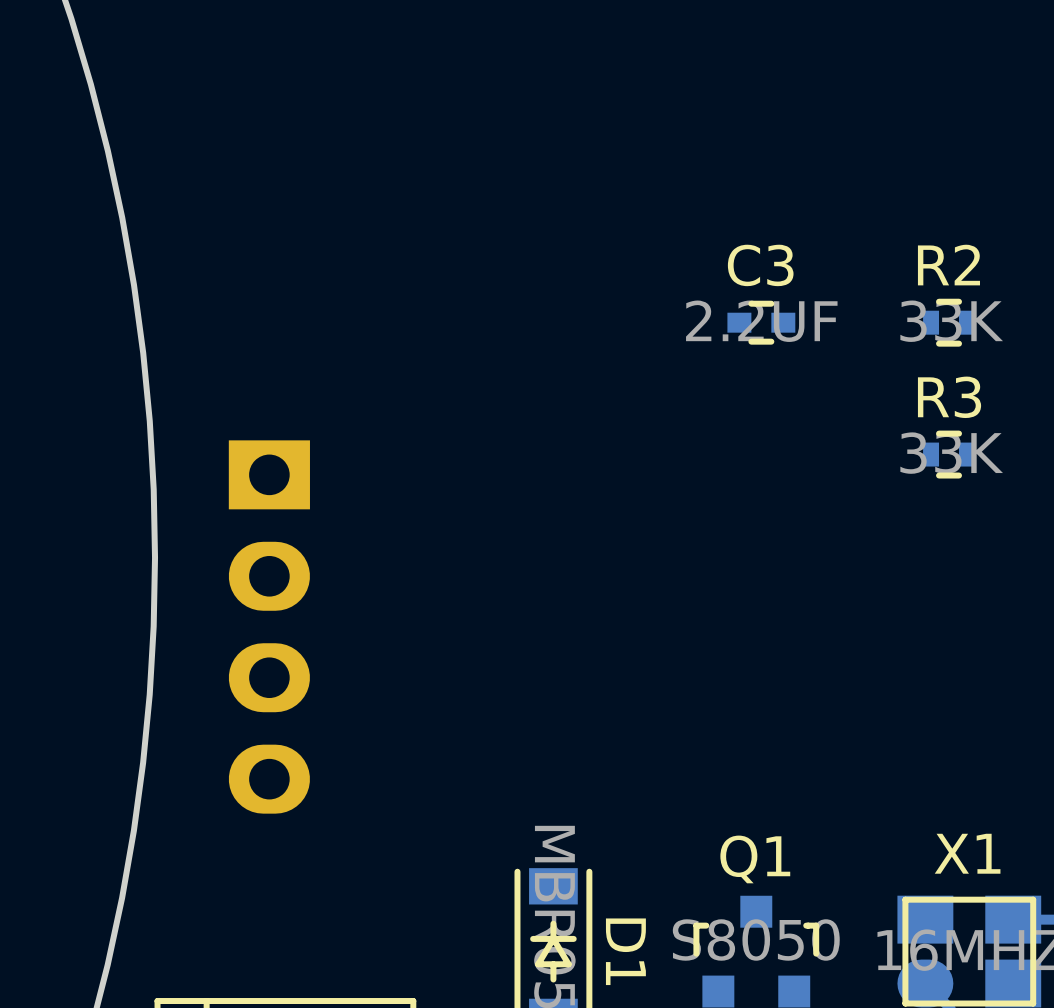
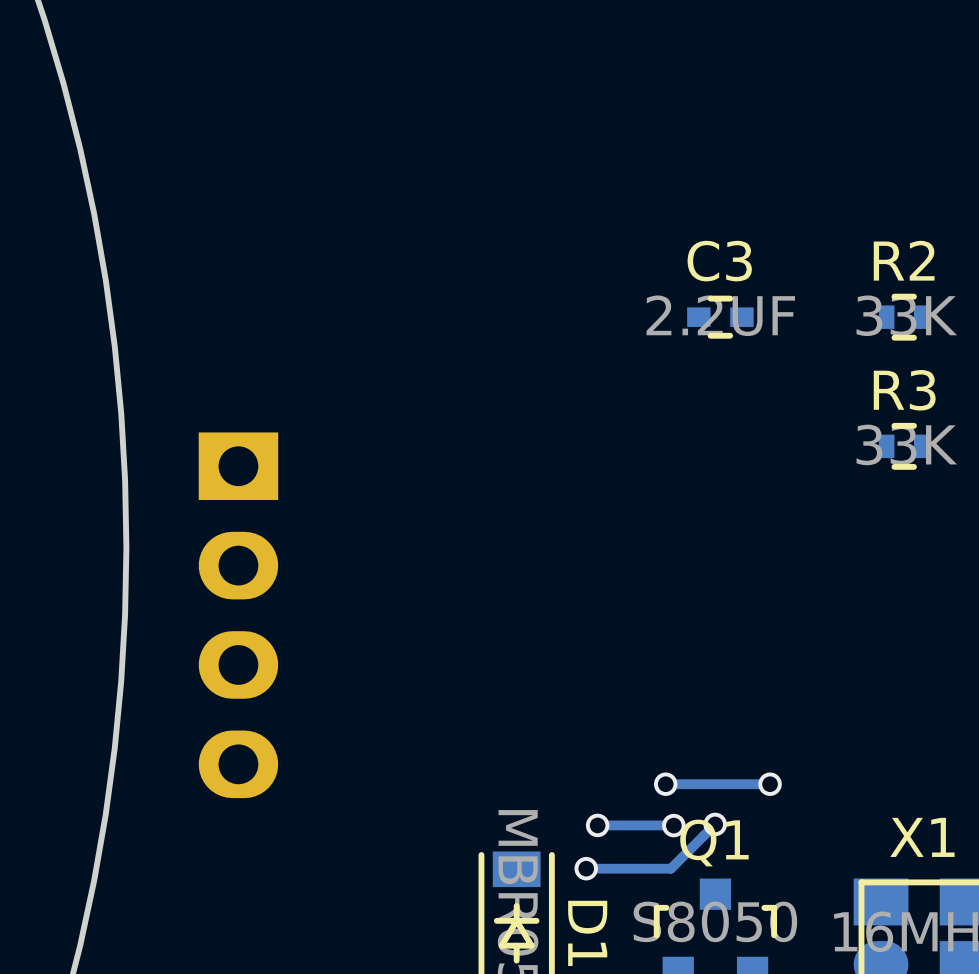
via: none -> (665, 784)
track: none -> (770, 784) (665, 784)
via: none -> (770, 784)
track: none -> (715, 824) (670, 868) (586, 868)
via: none -> (715, 824)
via: none -> (597, 825)
track: none -> (673, 825) (597, 825)
via: none -> (673, 825)
via: none -> (586, 868)

